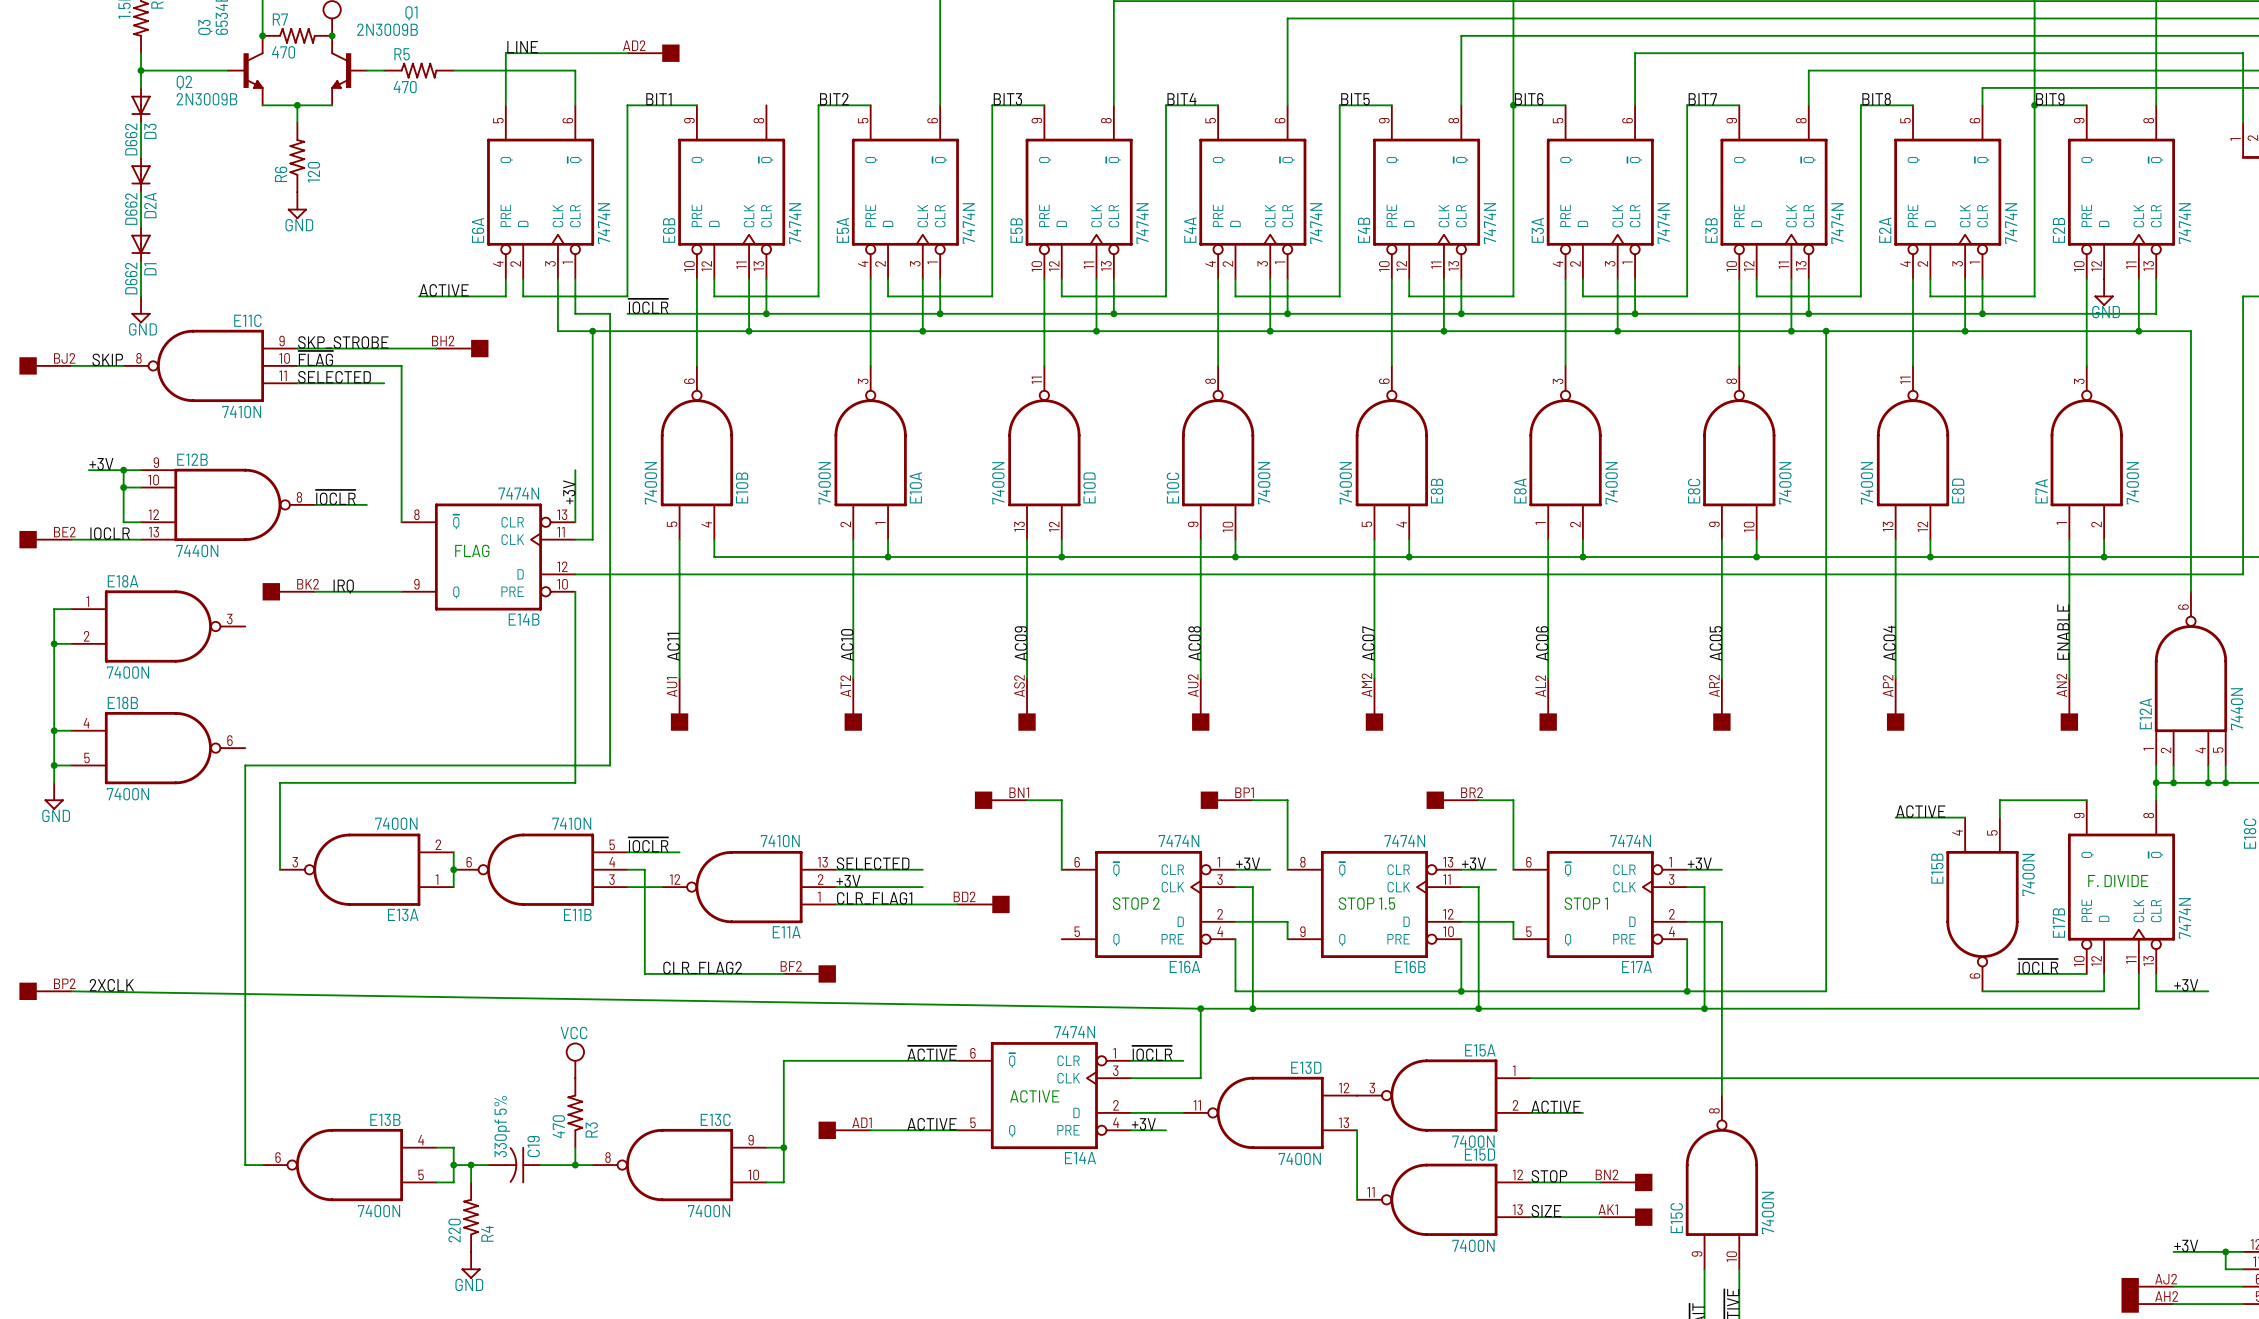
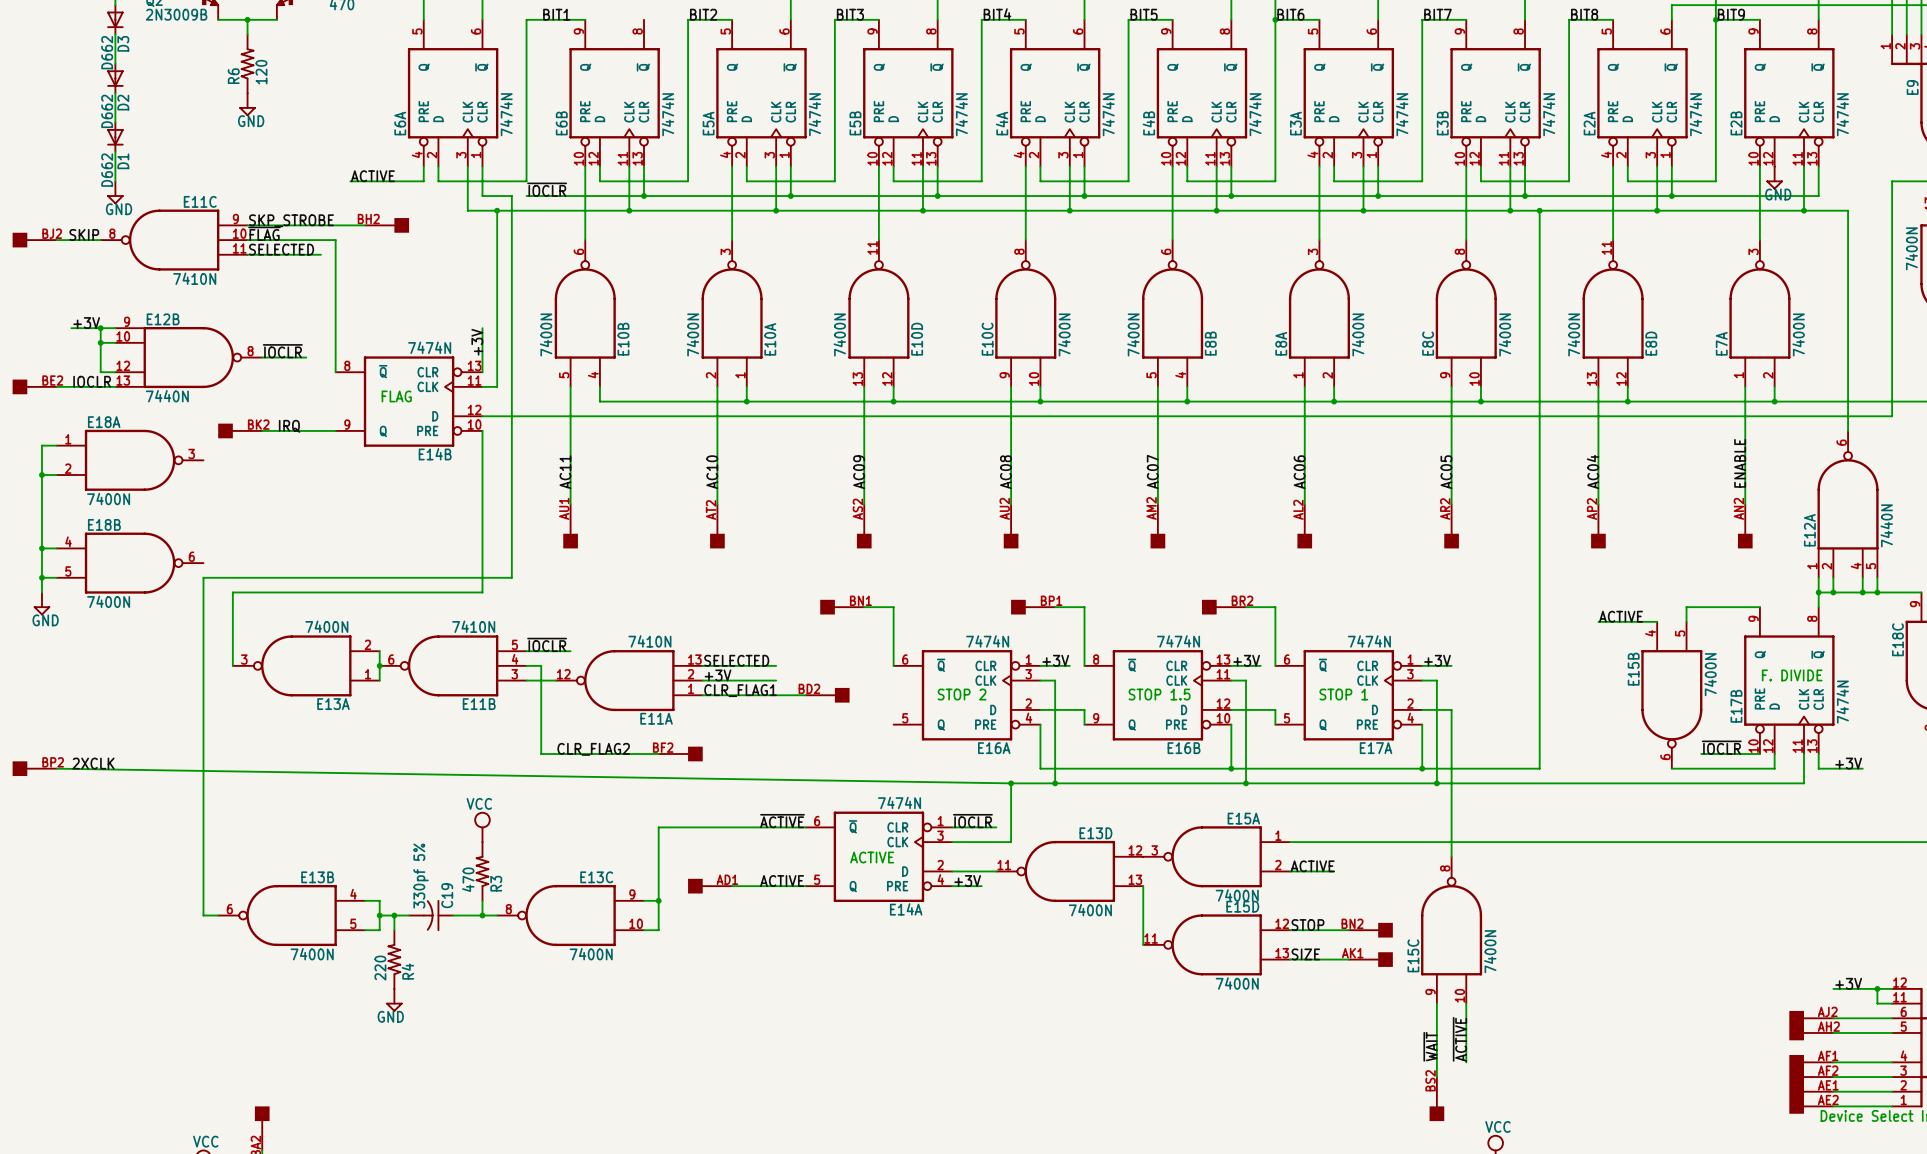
D2A name: D2A (150, 205) -> D2 (123, 102)

